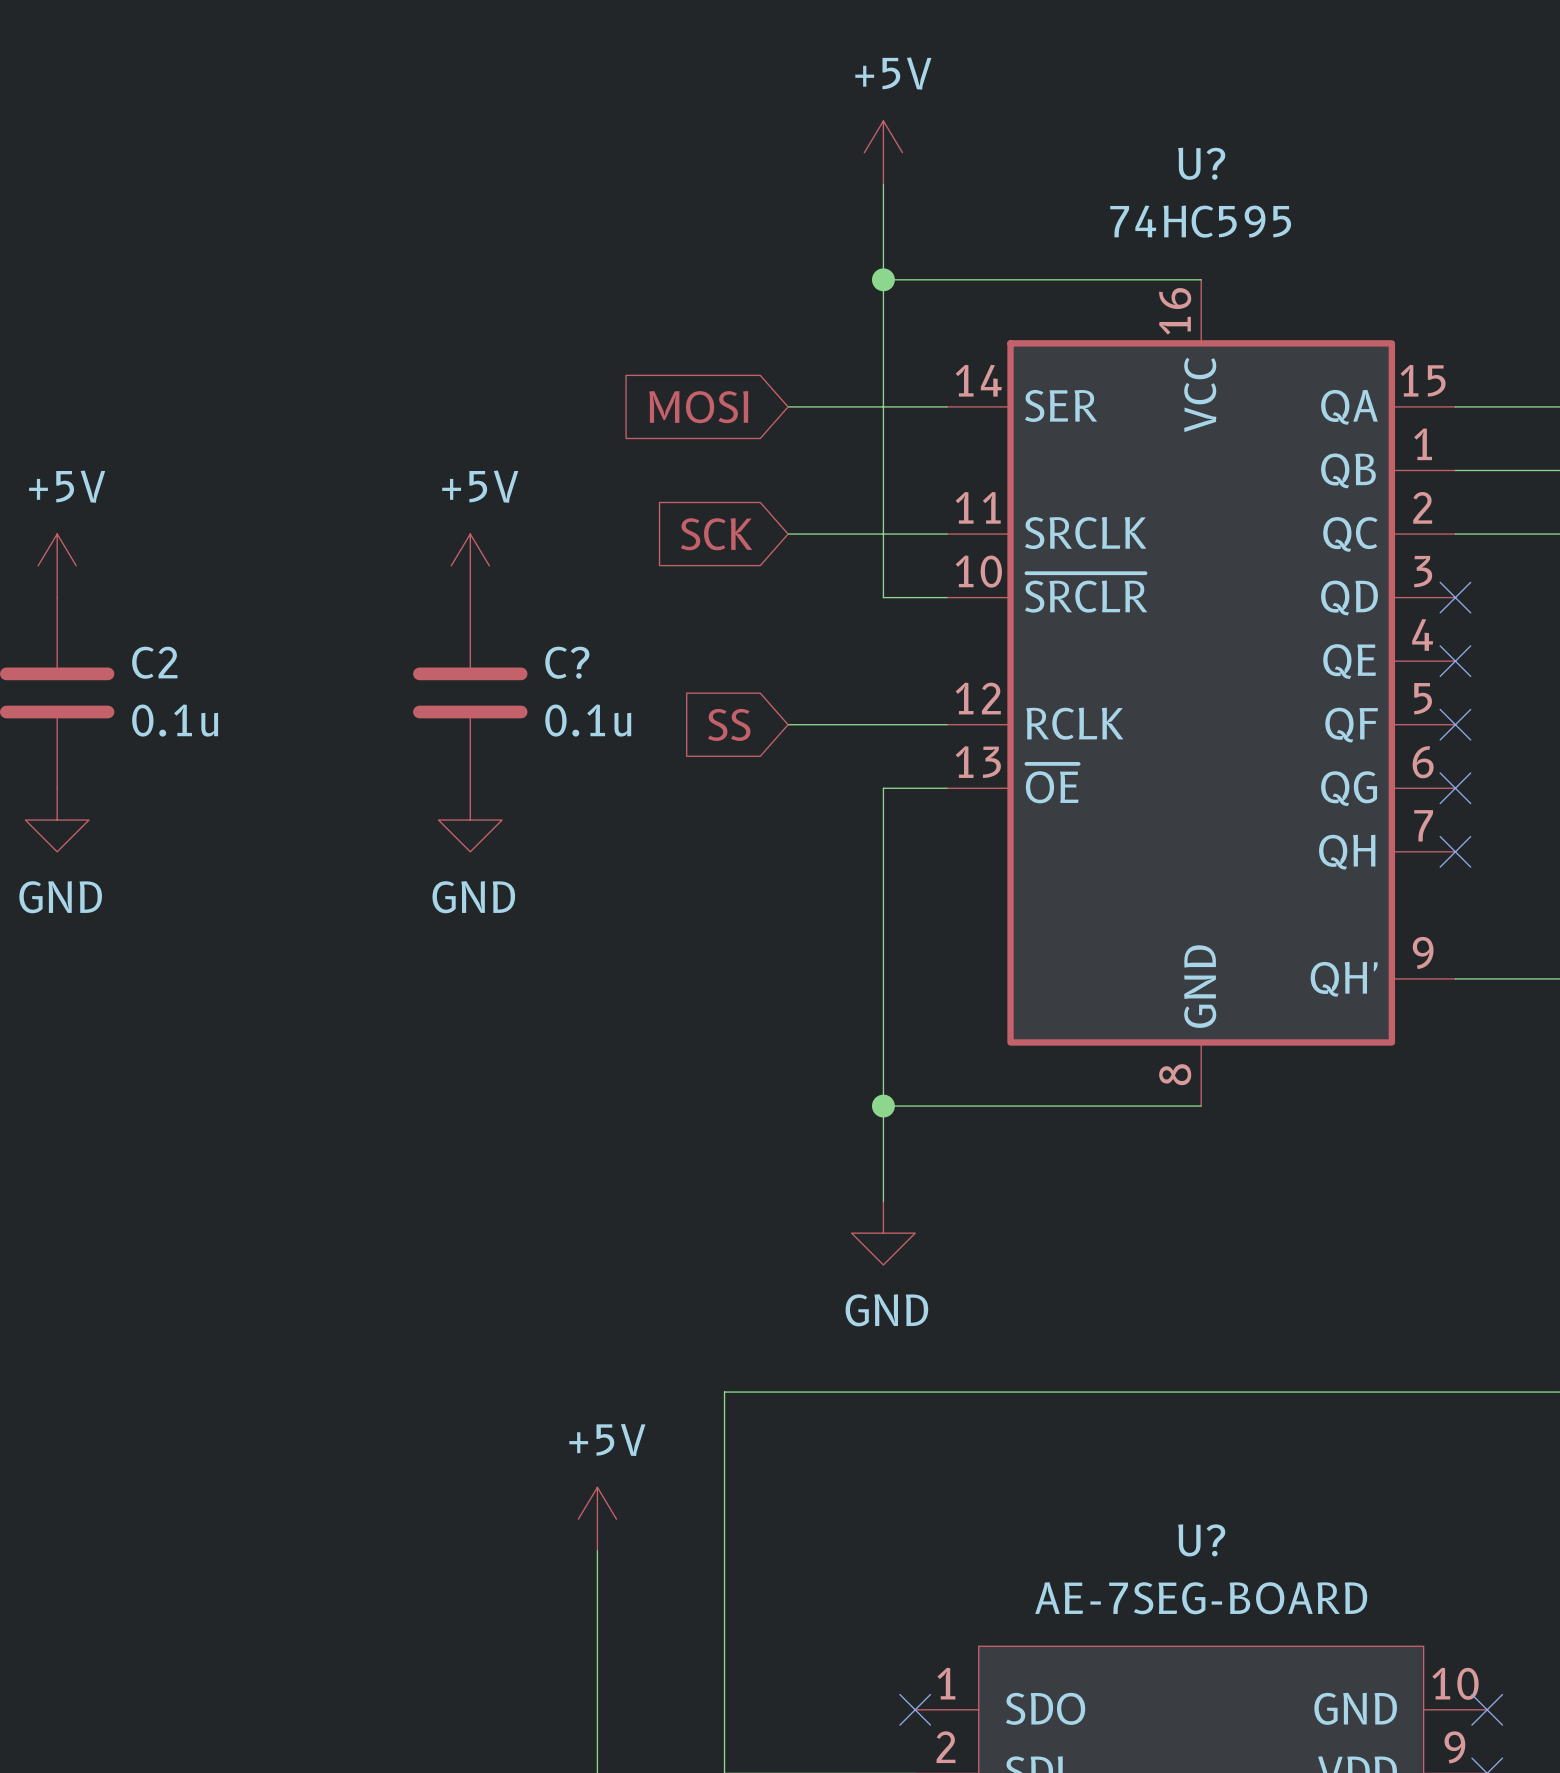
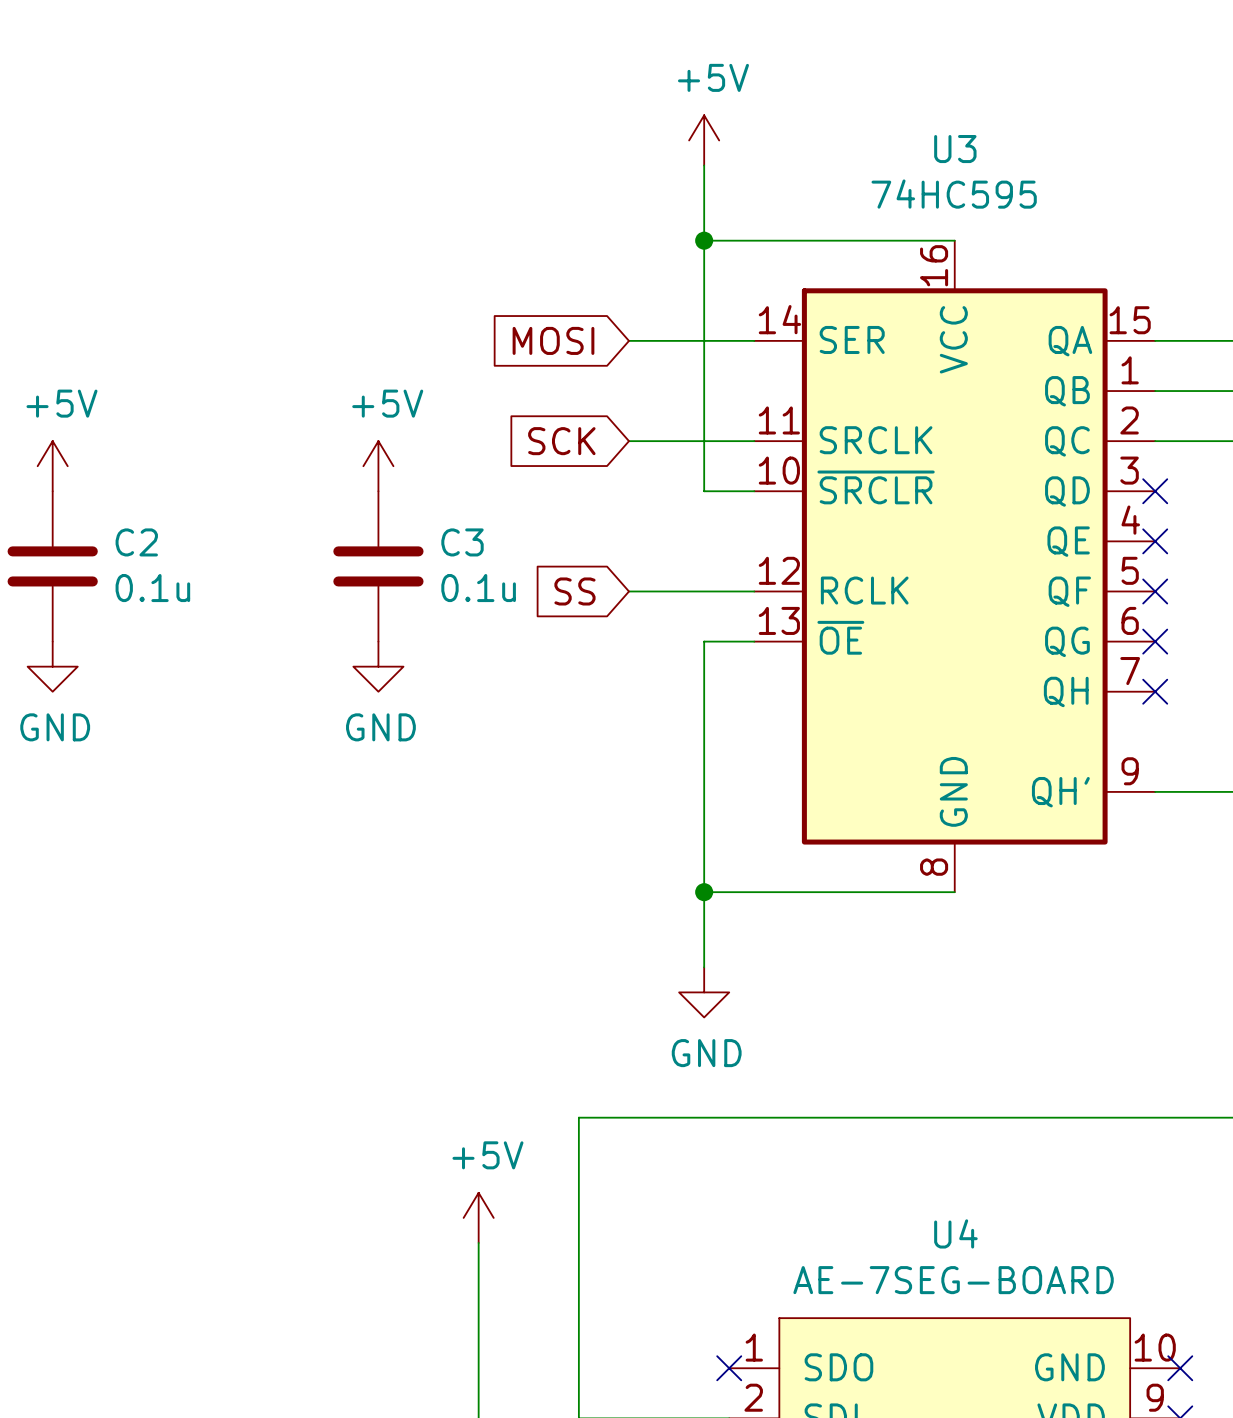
U? name: U? (1201, 163) -> U3 (955, 149)
C? name: C? (567, 662) -> C3 (462, 542)
U? name: U? (1201, 1540) -> U4 (955, 1233)

